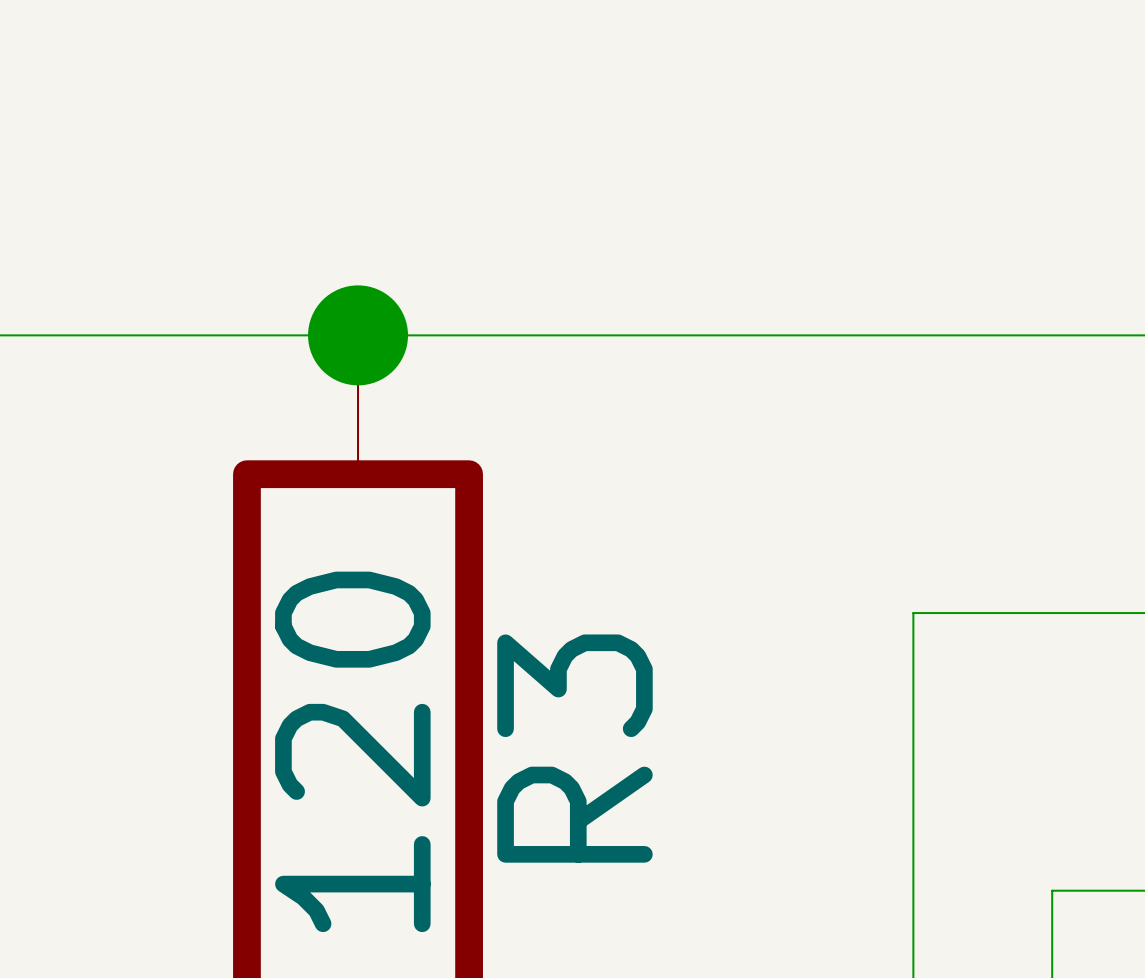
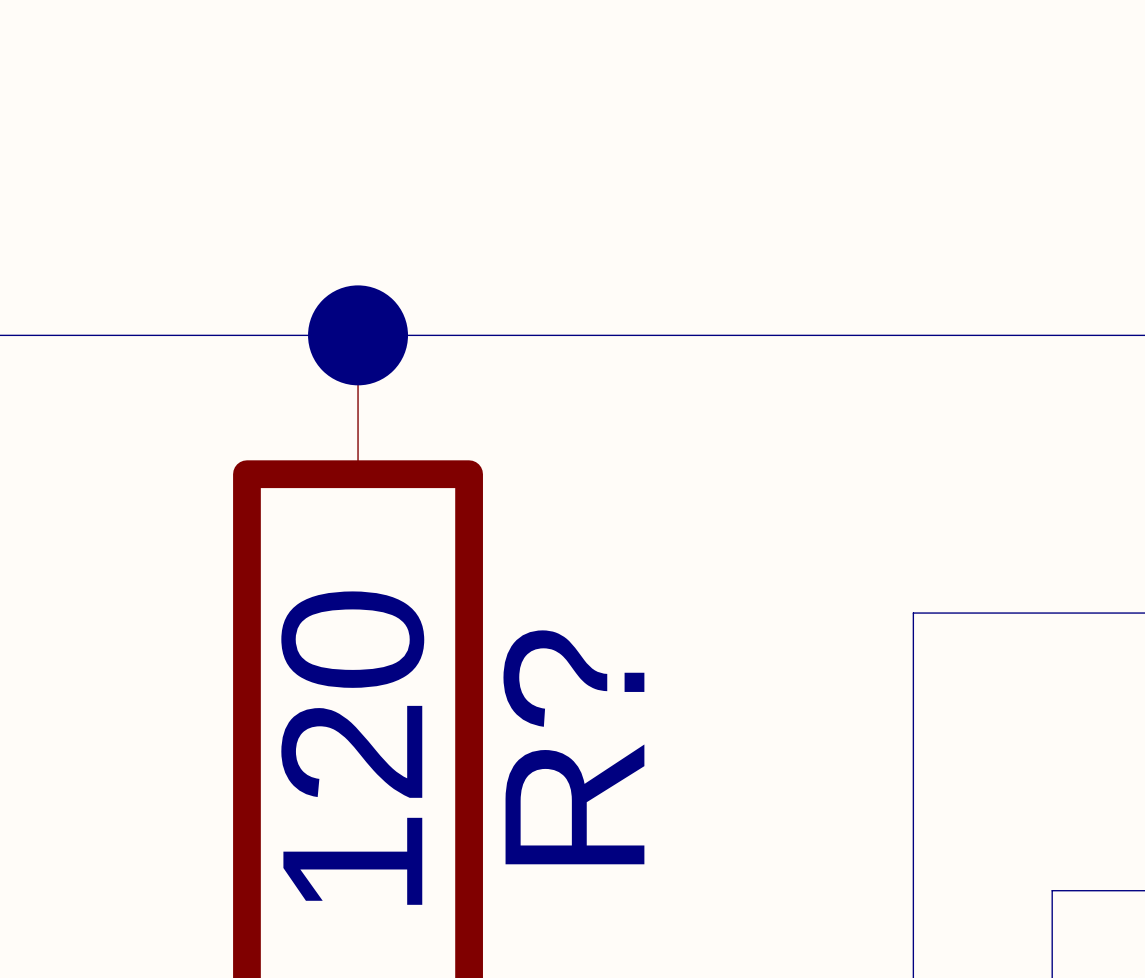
R3 name: R3 (574, 748) -> R? (573, 747)

